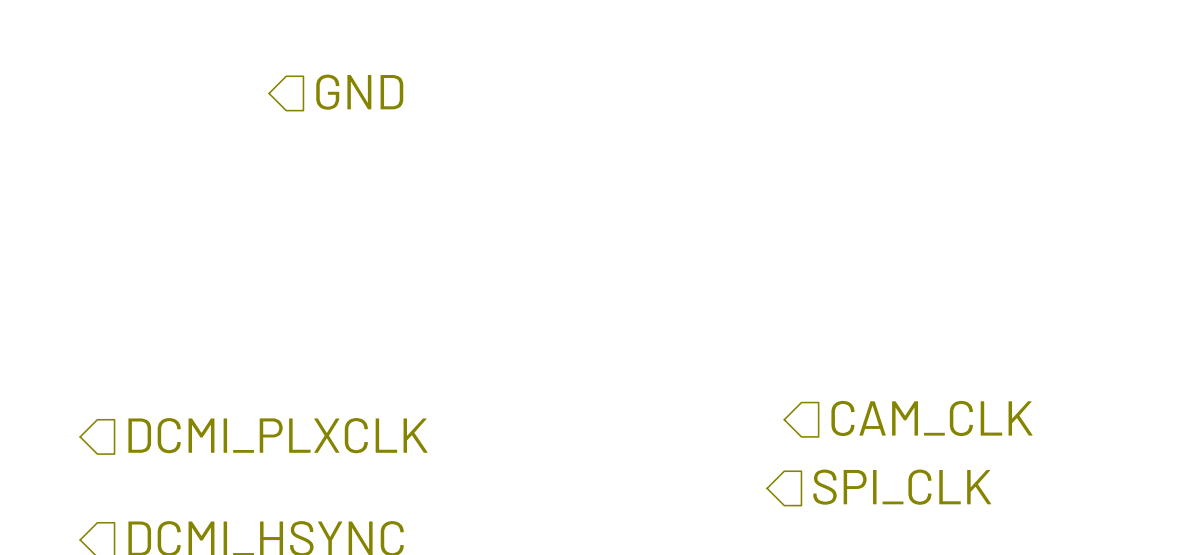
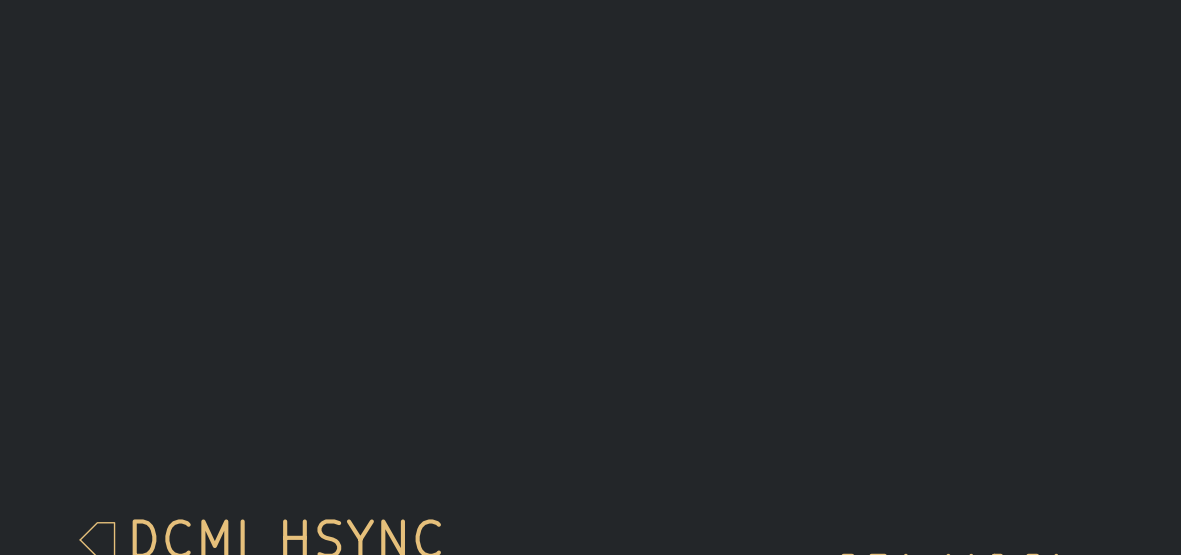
hierarchical label: GND (359, 92) -> none
hierarchical label: CAM_CLK (932, 418) -> none
hierarchical label: DCMI_PLXCLK (278, 435) -> none
hierarchical label: SPI_CLK (902, 487) -> none

